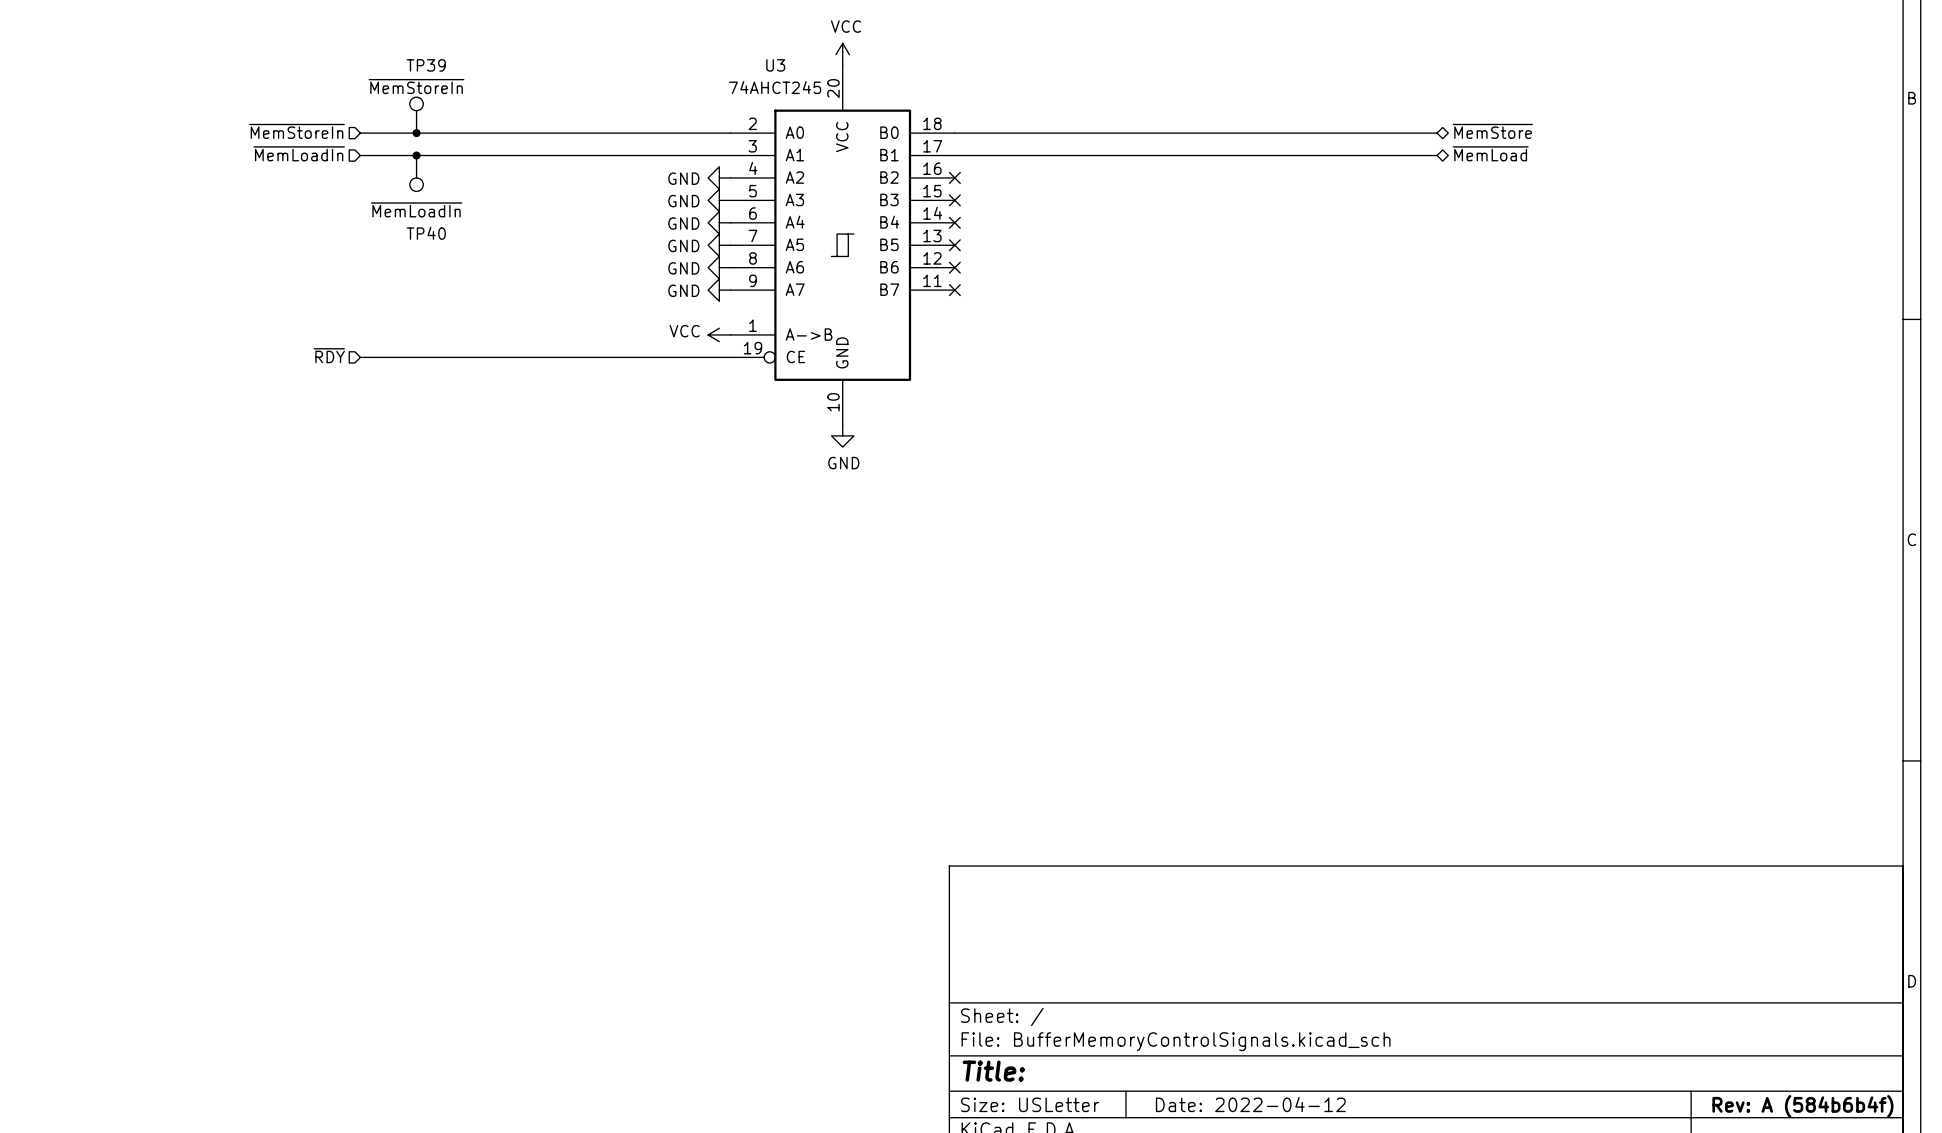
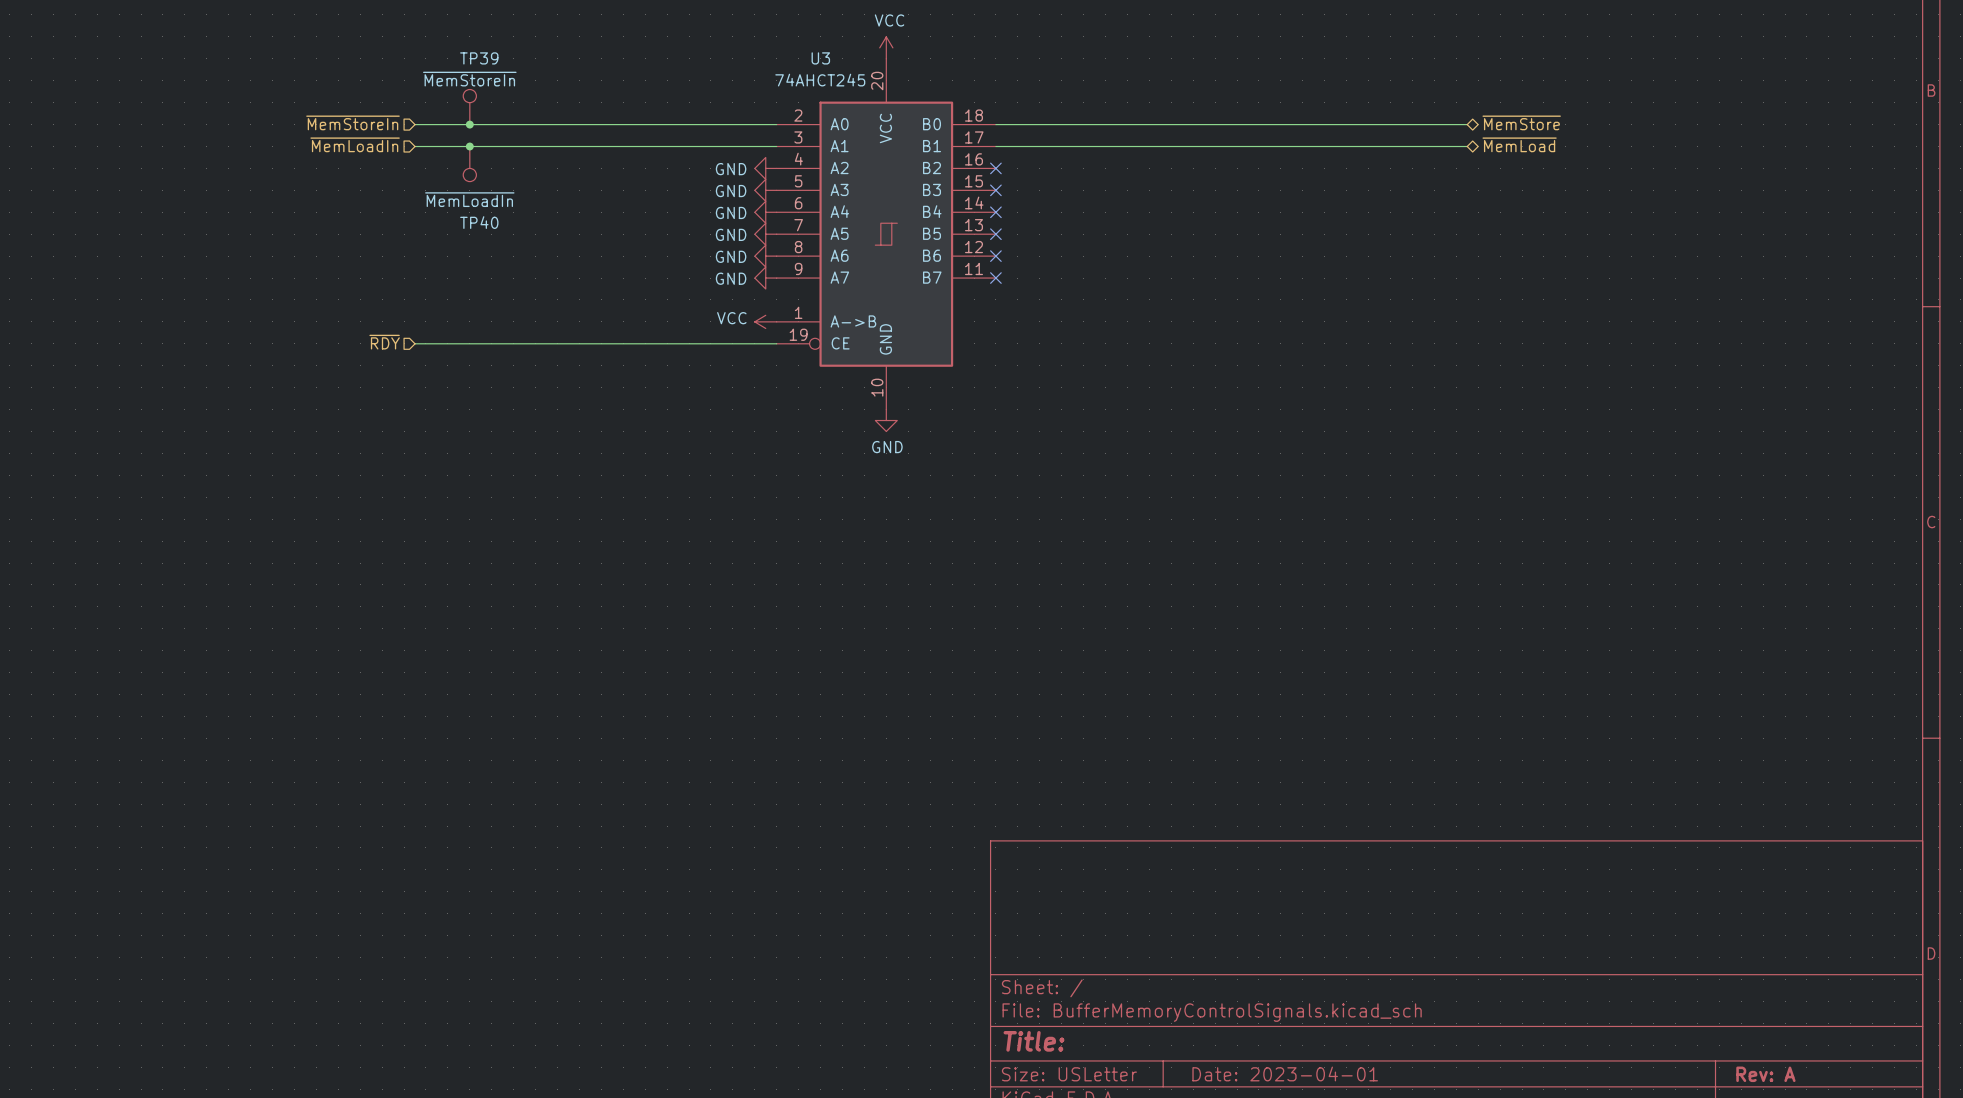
title block: Date: 2022-04-12 (1250, 1104) -> Date: 2023-04-01 (1285, 1073)
title block: Rev: A (584b6b4f) (1802, 1106) -> Rev: A (1765, 1074)

